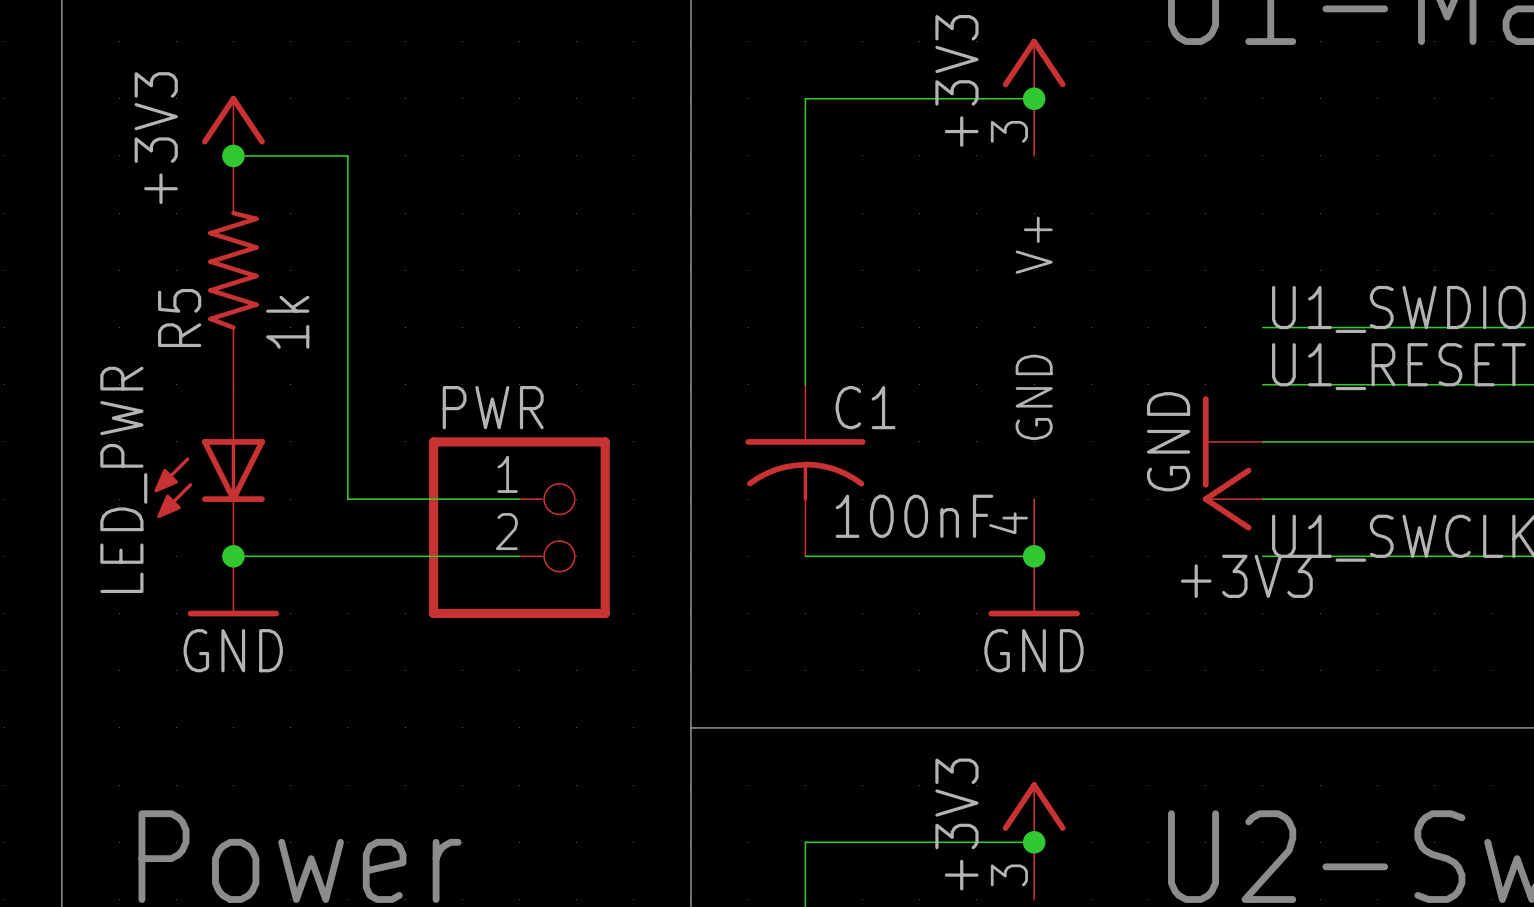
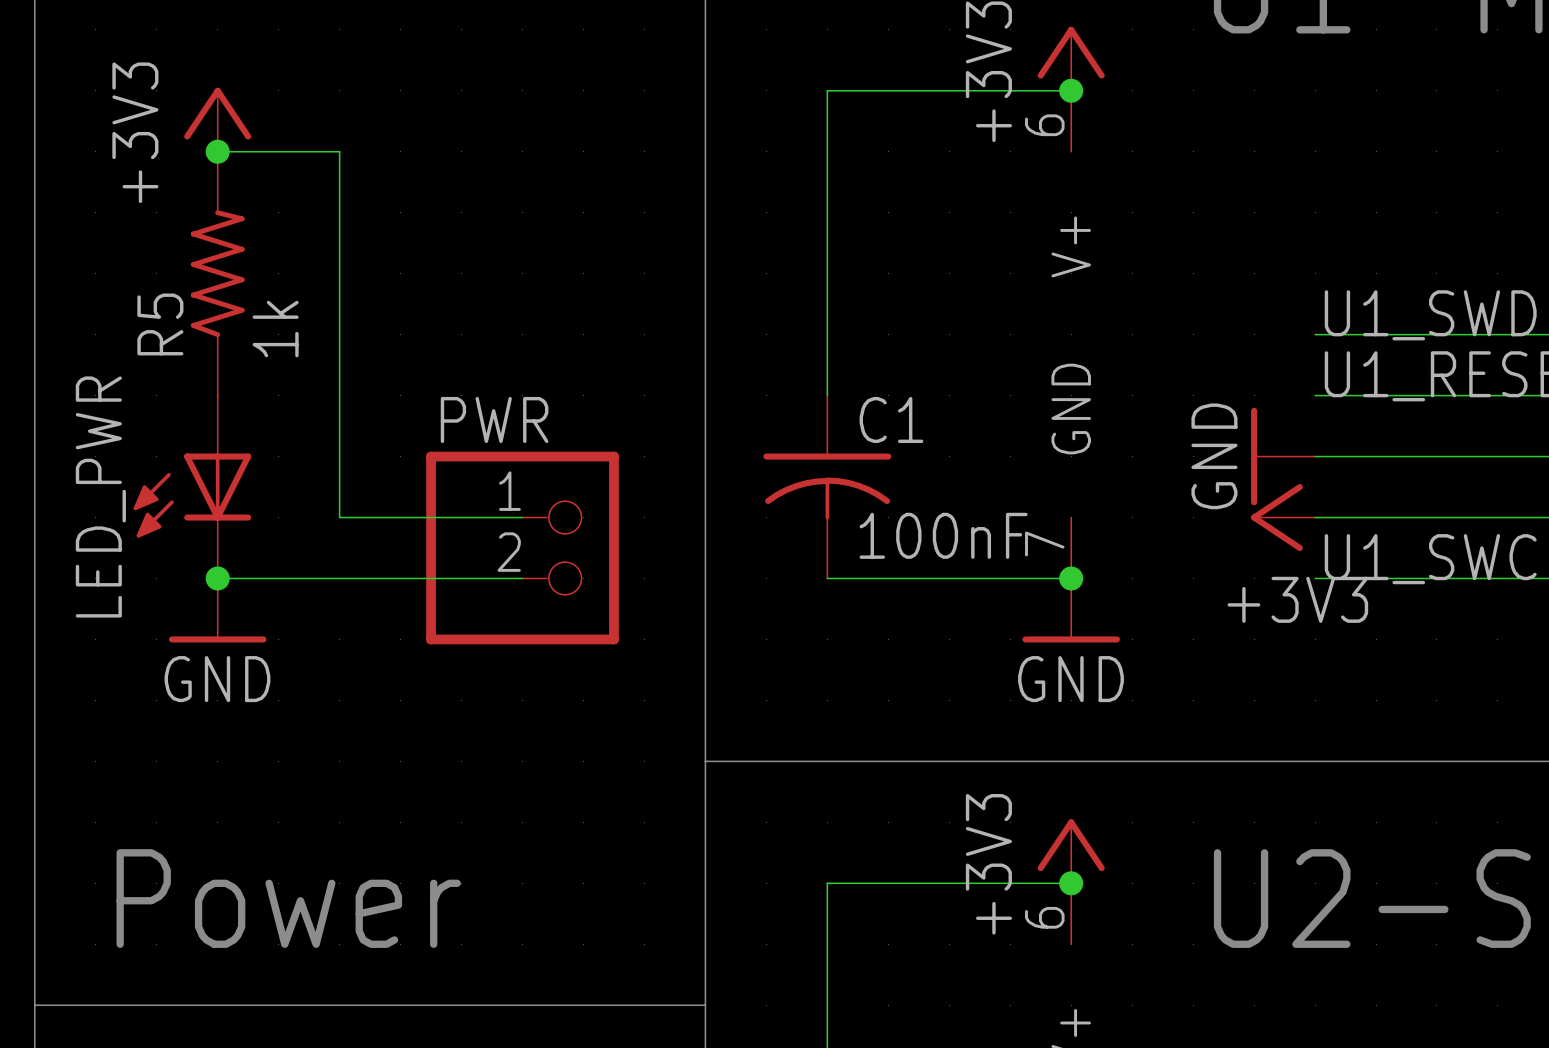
part pin number: 3 (1009, 131) -> 6 (1044, 125)
part pin number: 4 (1008, 523) -> 7 (1044, 544)
part pin number: 3 (1009, 875) -> 6 (1044, 917)

